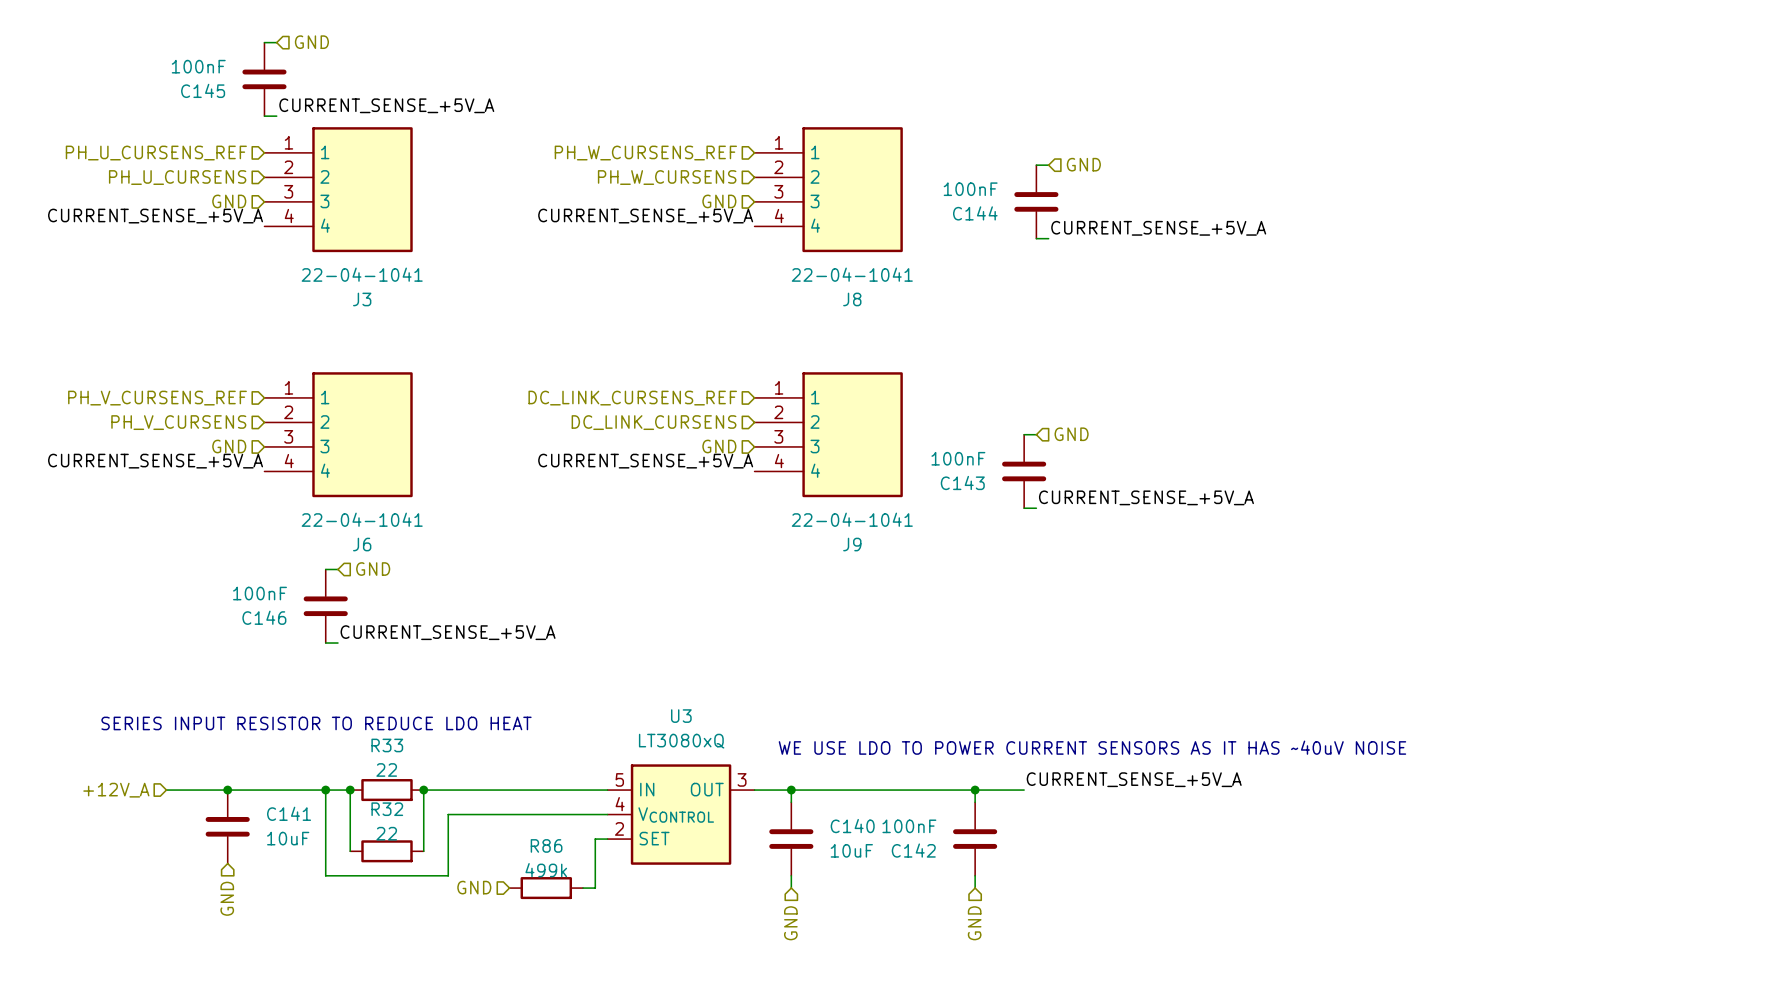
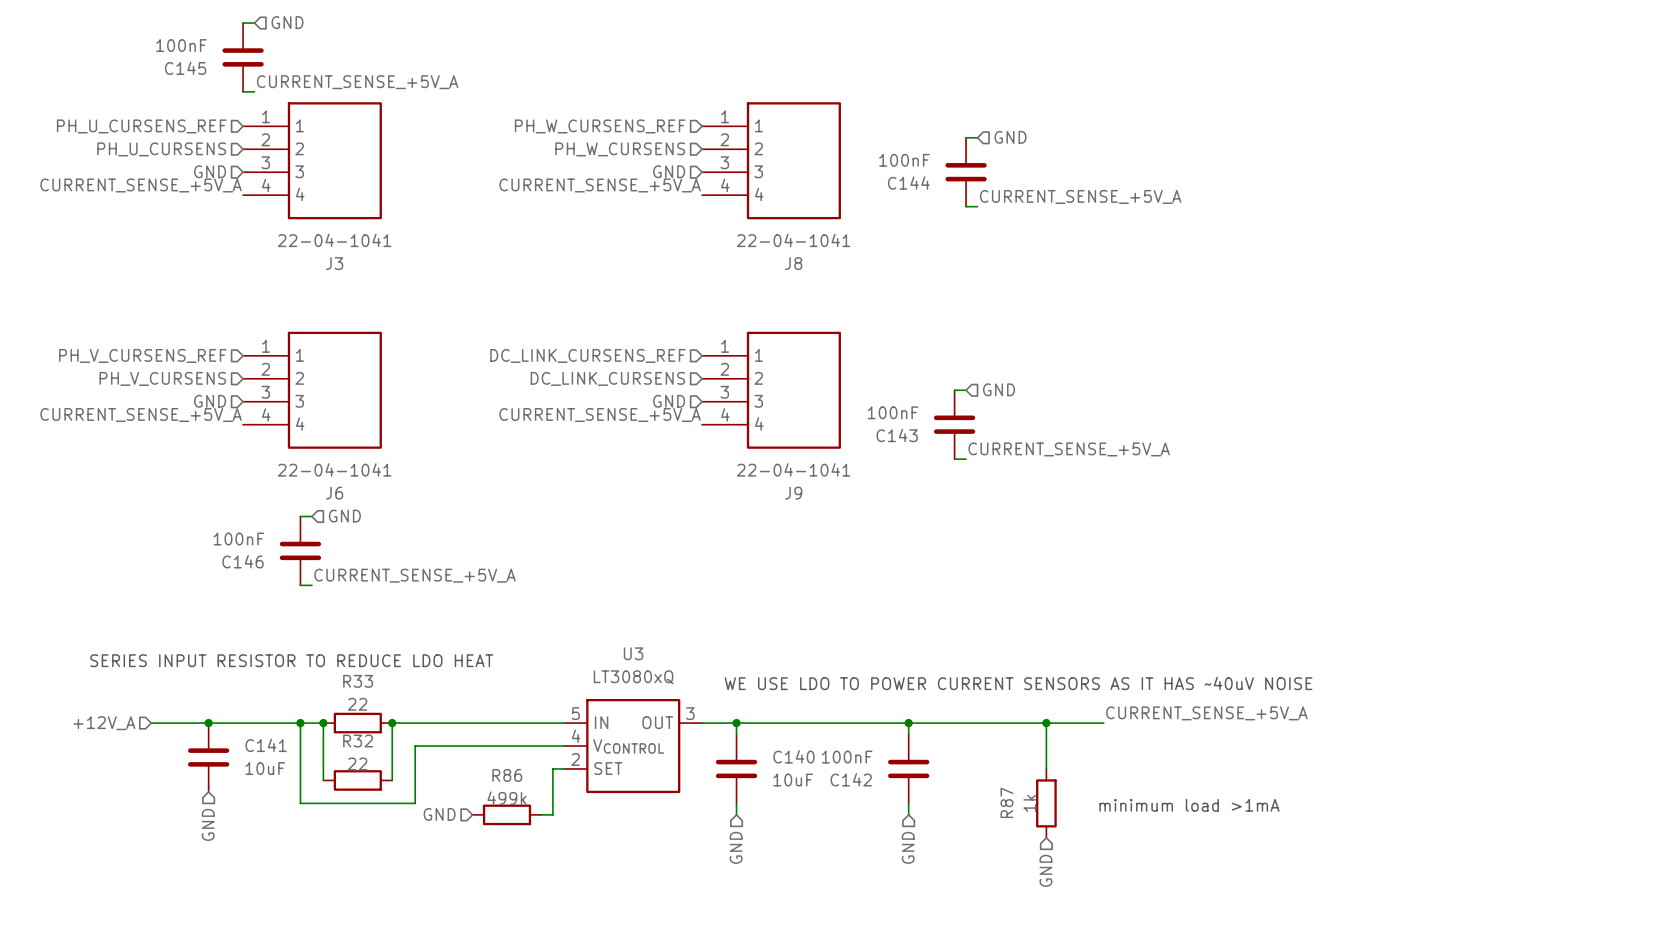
label position: CURRENT_SENSE_+5V_A (1134, 779) -> CURRENT_SENSE_+5V_A (1206, 713)
wire: none -> (954, 723) (1103, 723)
wire: none -> (1046, 723) (1046, 768)
junction: none -> (1046, 723)
R87: none -> 1k (1046, 803)
text: none -> minimum load >1mA (1189, 805)
hierarchical label: none -> GND (1045, 870)

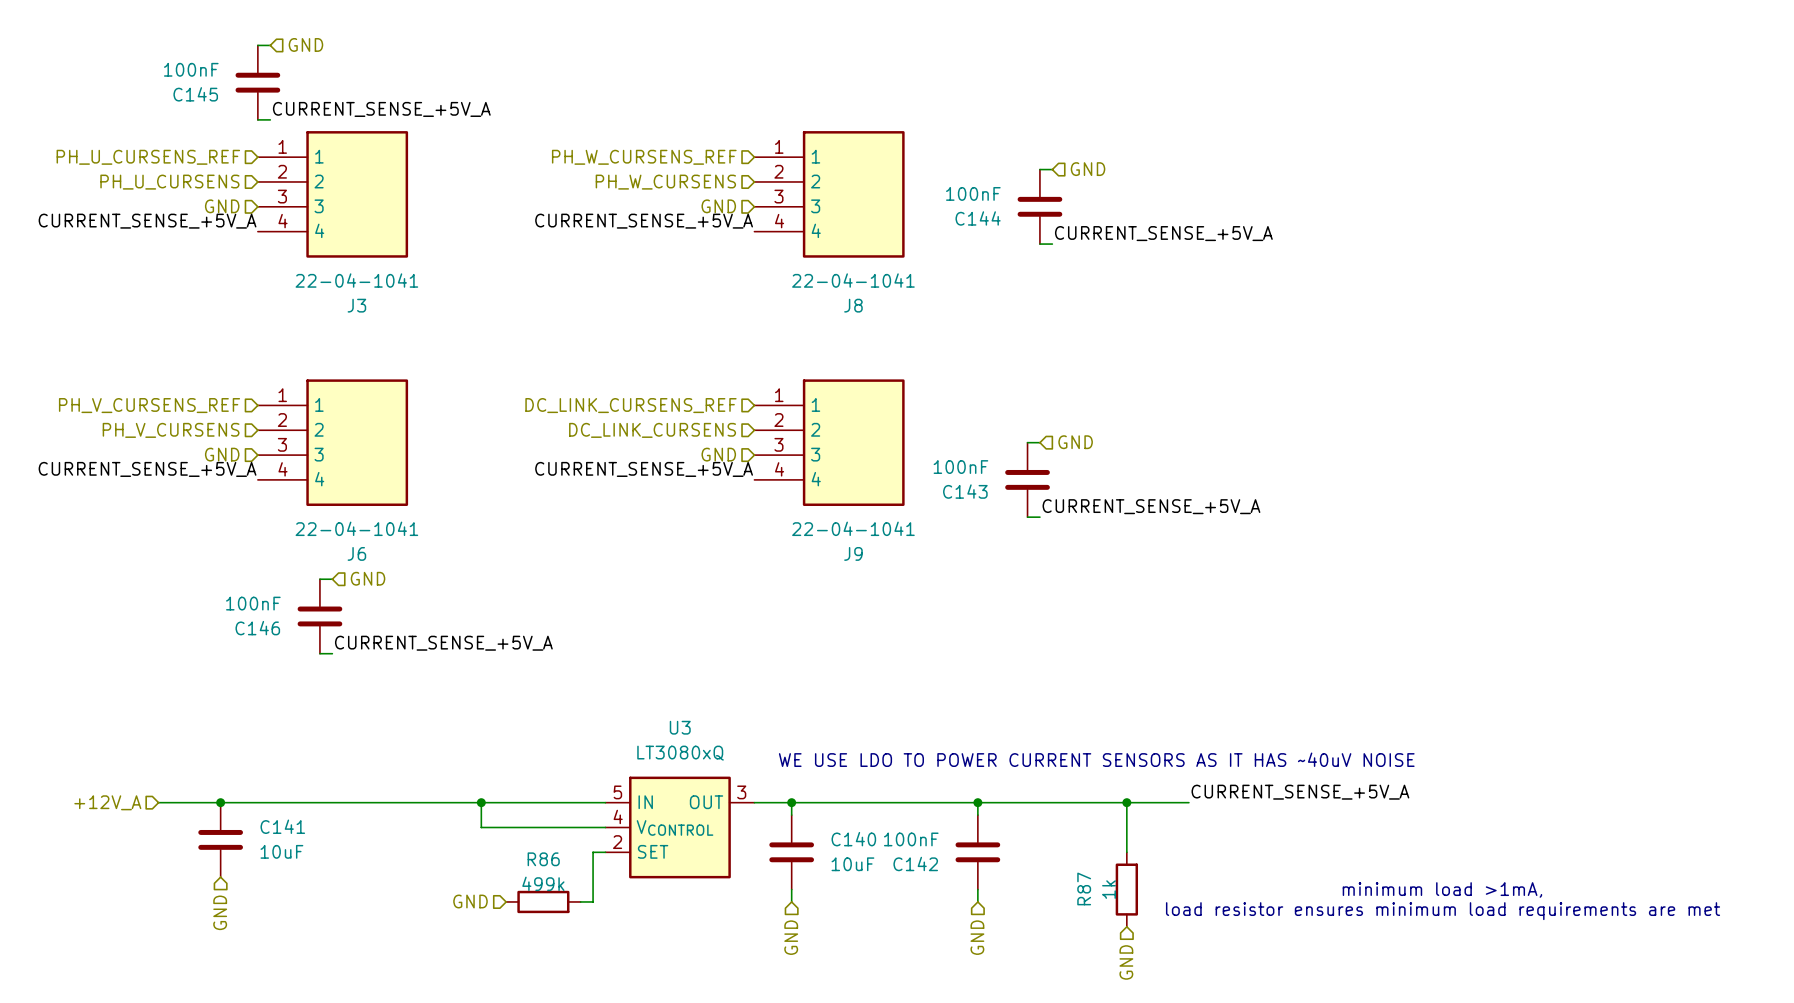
text: SERIES INPUT RESISTOR TO REDUCE LDO HEAT (291, 660) -> none
wire: (300, 723) (300, 803) (415, 803) (415, 746) (449, 746) -> (481, 802) (481, 827)
junction: (300, 723) -> none
wire: (323, 723) (323, 780) -> (344, 802) (419, 802)
junction: (323, 723) -> none
R33: 22 (357, 723) -> none
wire: (392, 723) (392, 780) -> none
junction: (392, 723) -> none
junction: none -> (481, 802)
R32: 22 (357, 780) -> none
text: minimum load >1mA (1189, 805) -> minimum load >1mA, (1442, 889)
text: none -> load resistor ensures minimum load requirements are met (1443, 911)

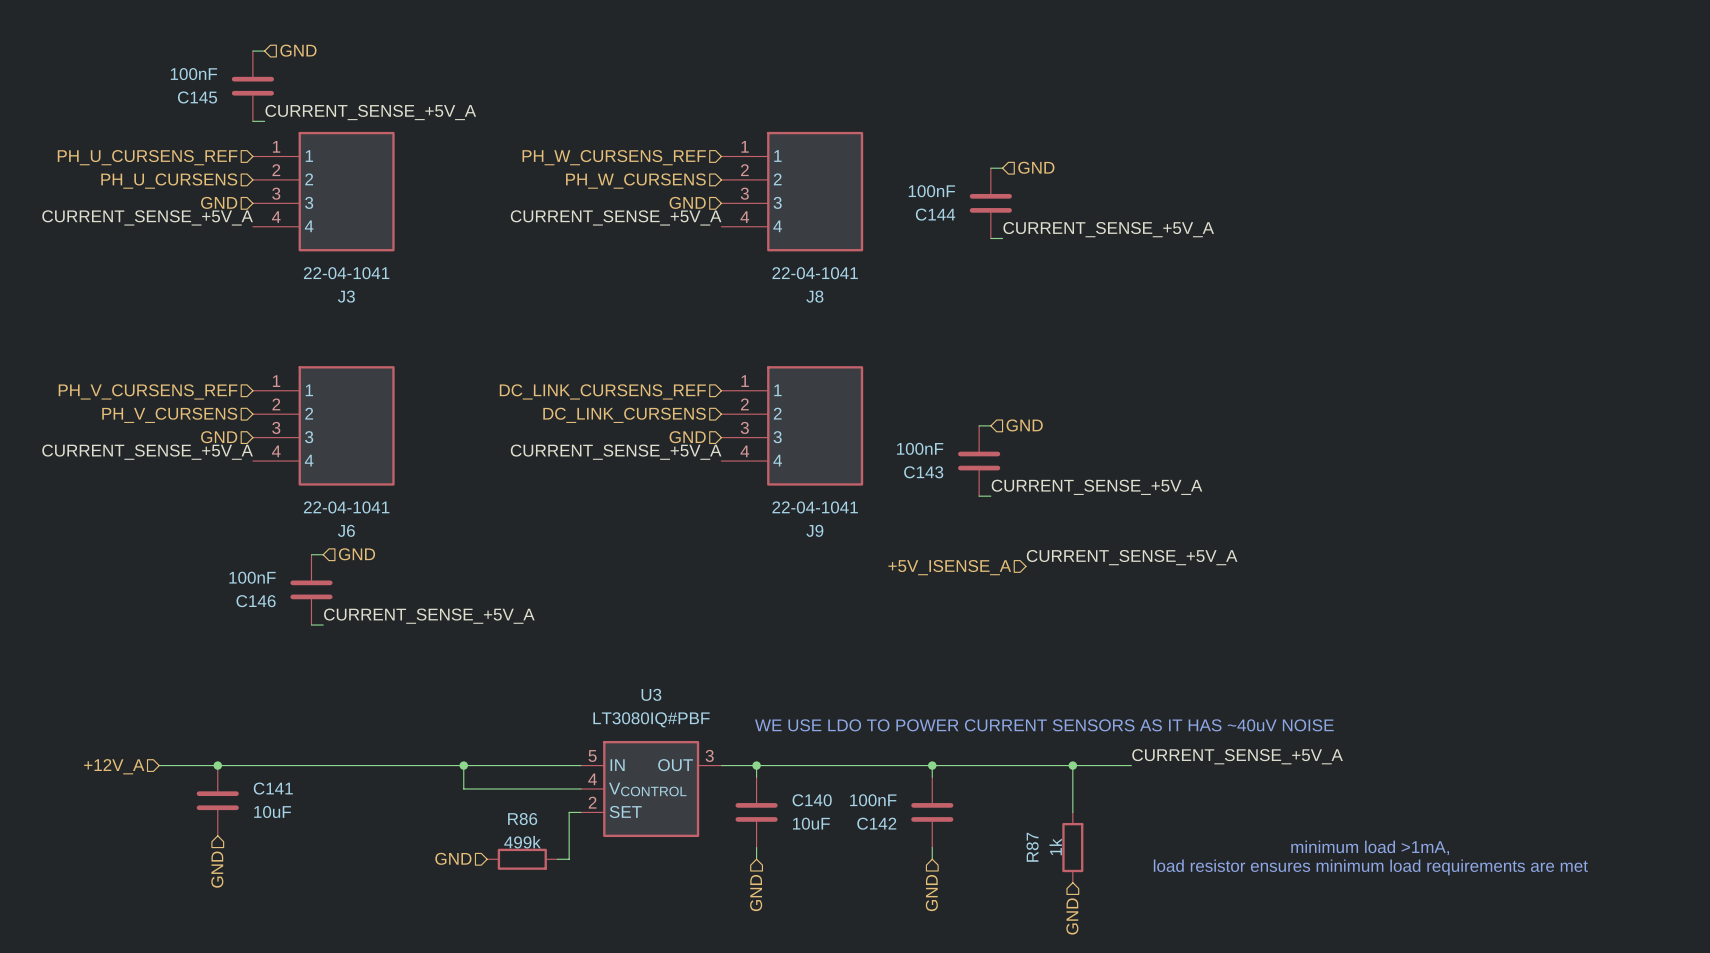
label: none -> CURRENT_SENSE_+5V_A (1132, 557)
hierarchical label: none -> +5V_ISENSE_A (949, 567)
U3 value: LT3080xQ (680, 753) -> LT3080IQ#PBF (651, 719)

